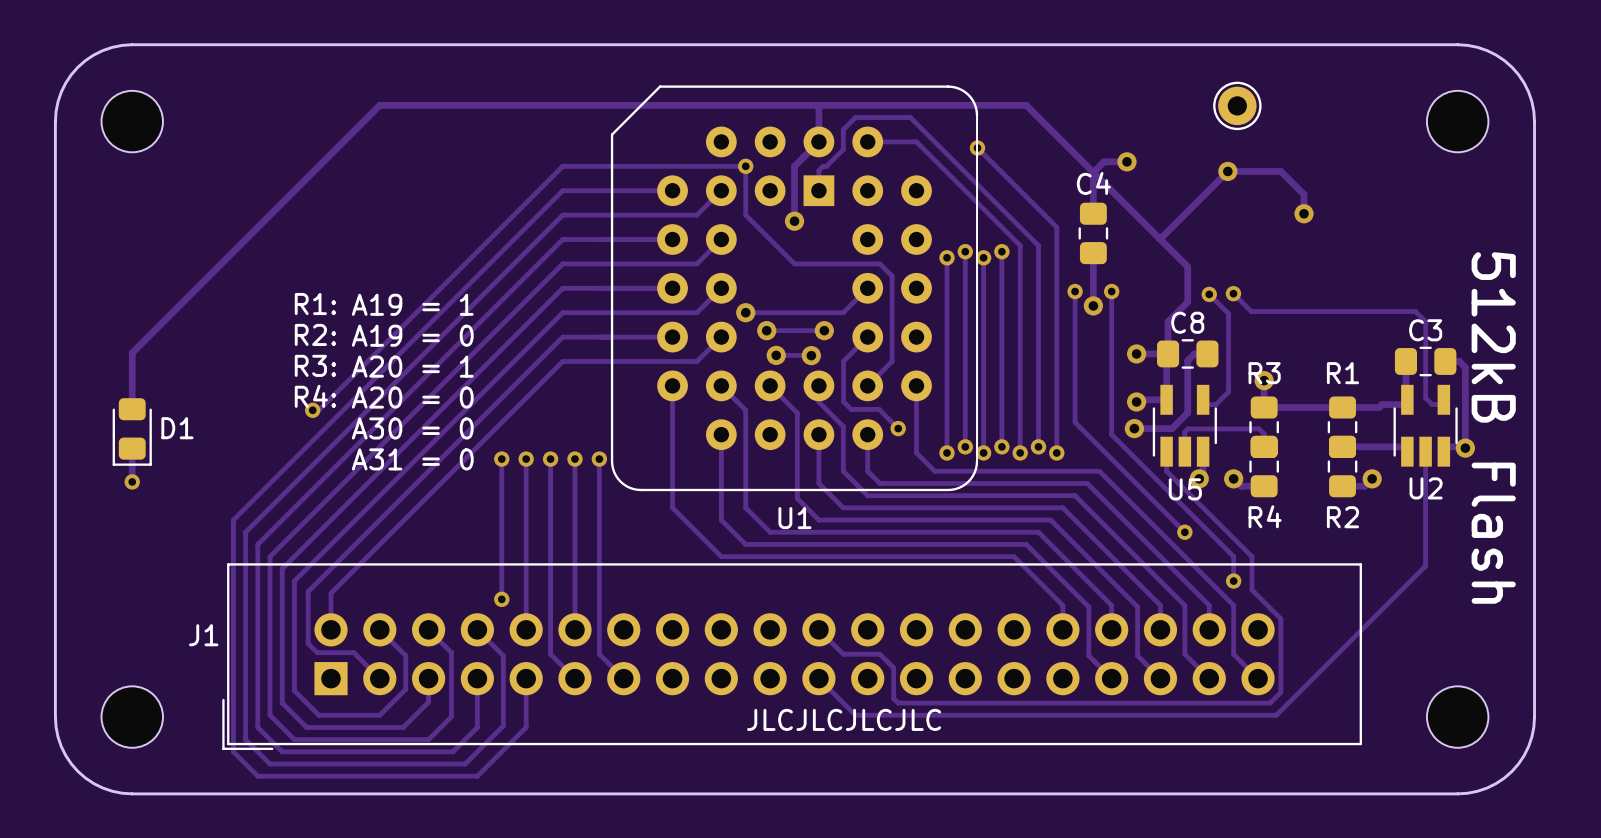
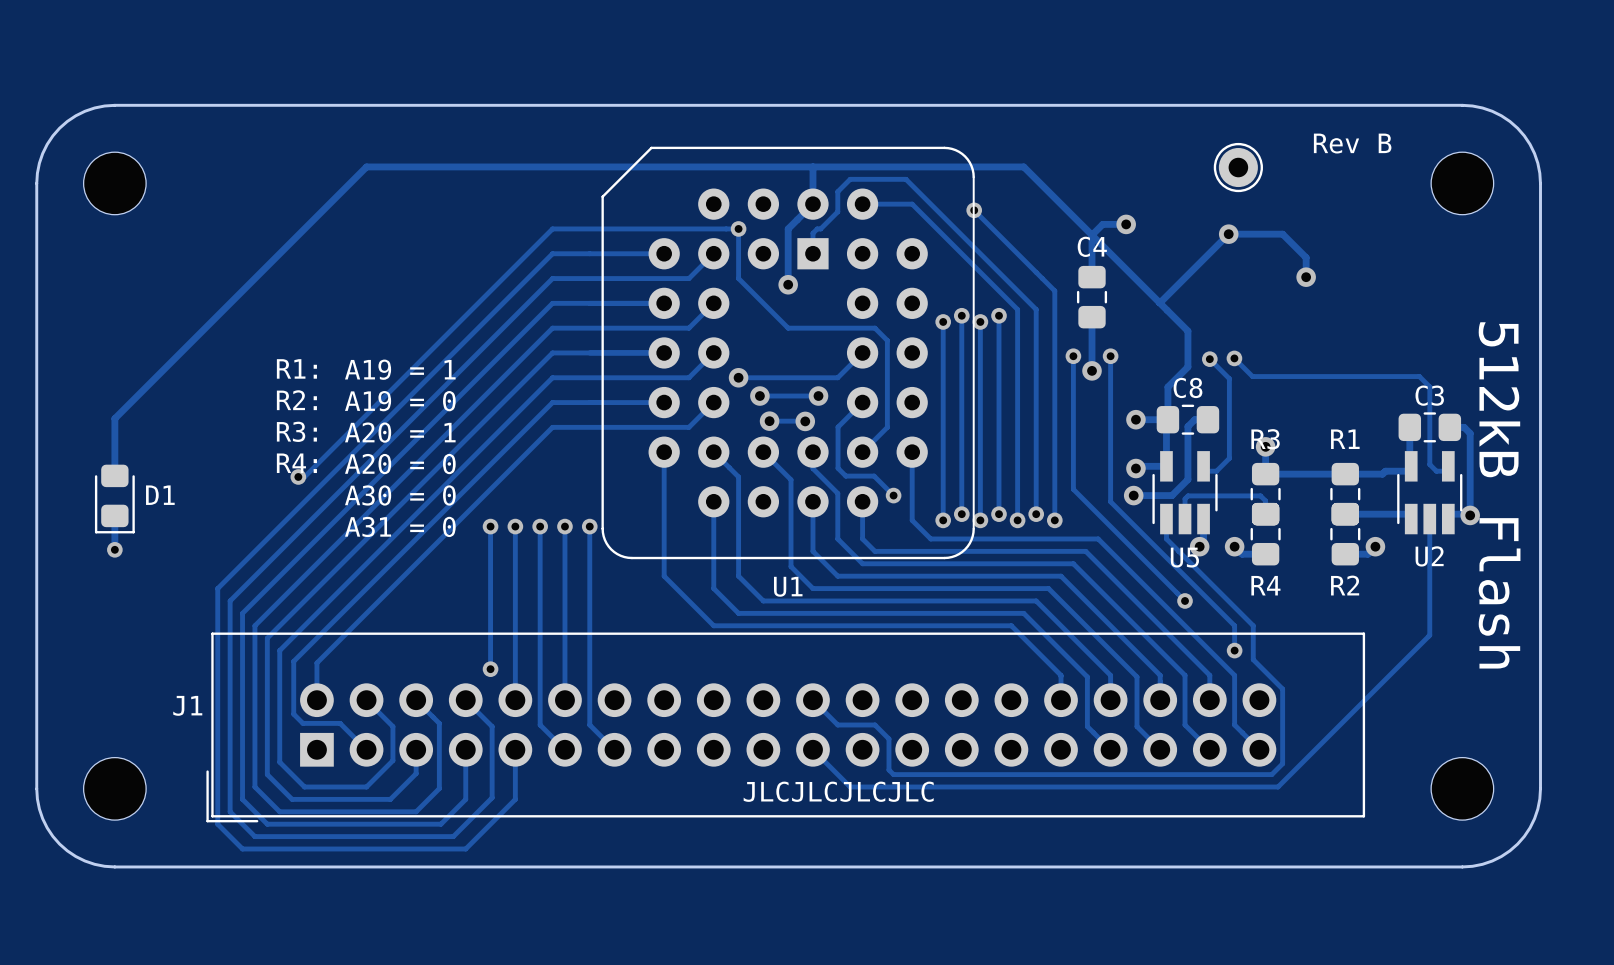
text: none -> Rev B (1352, 143)

